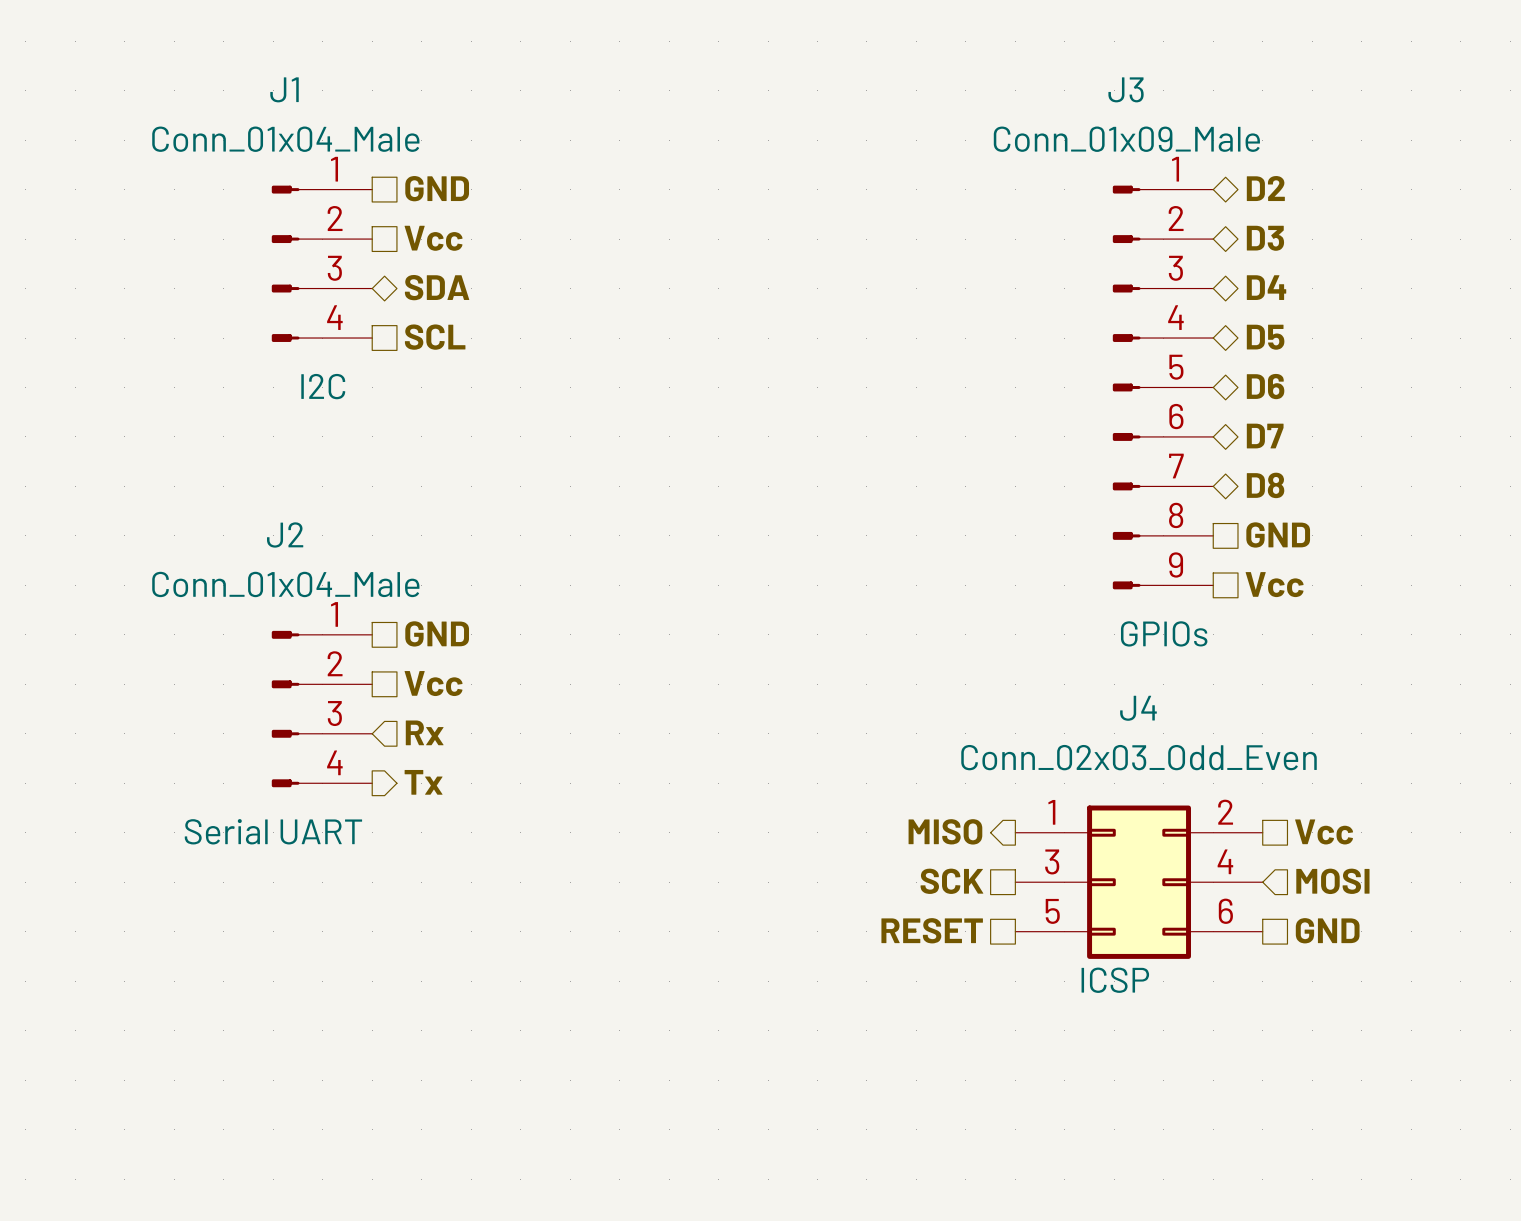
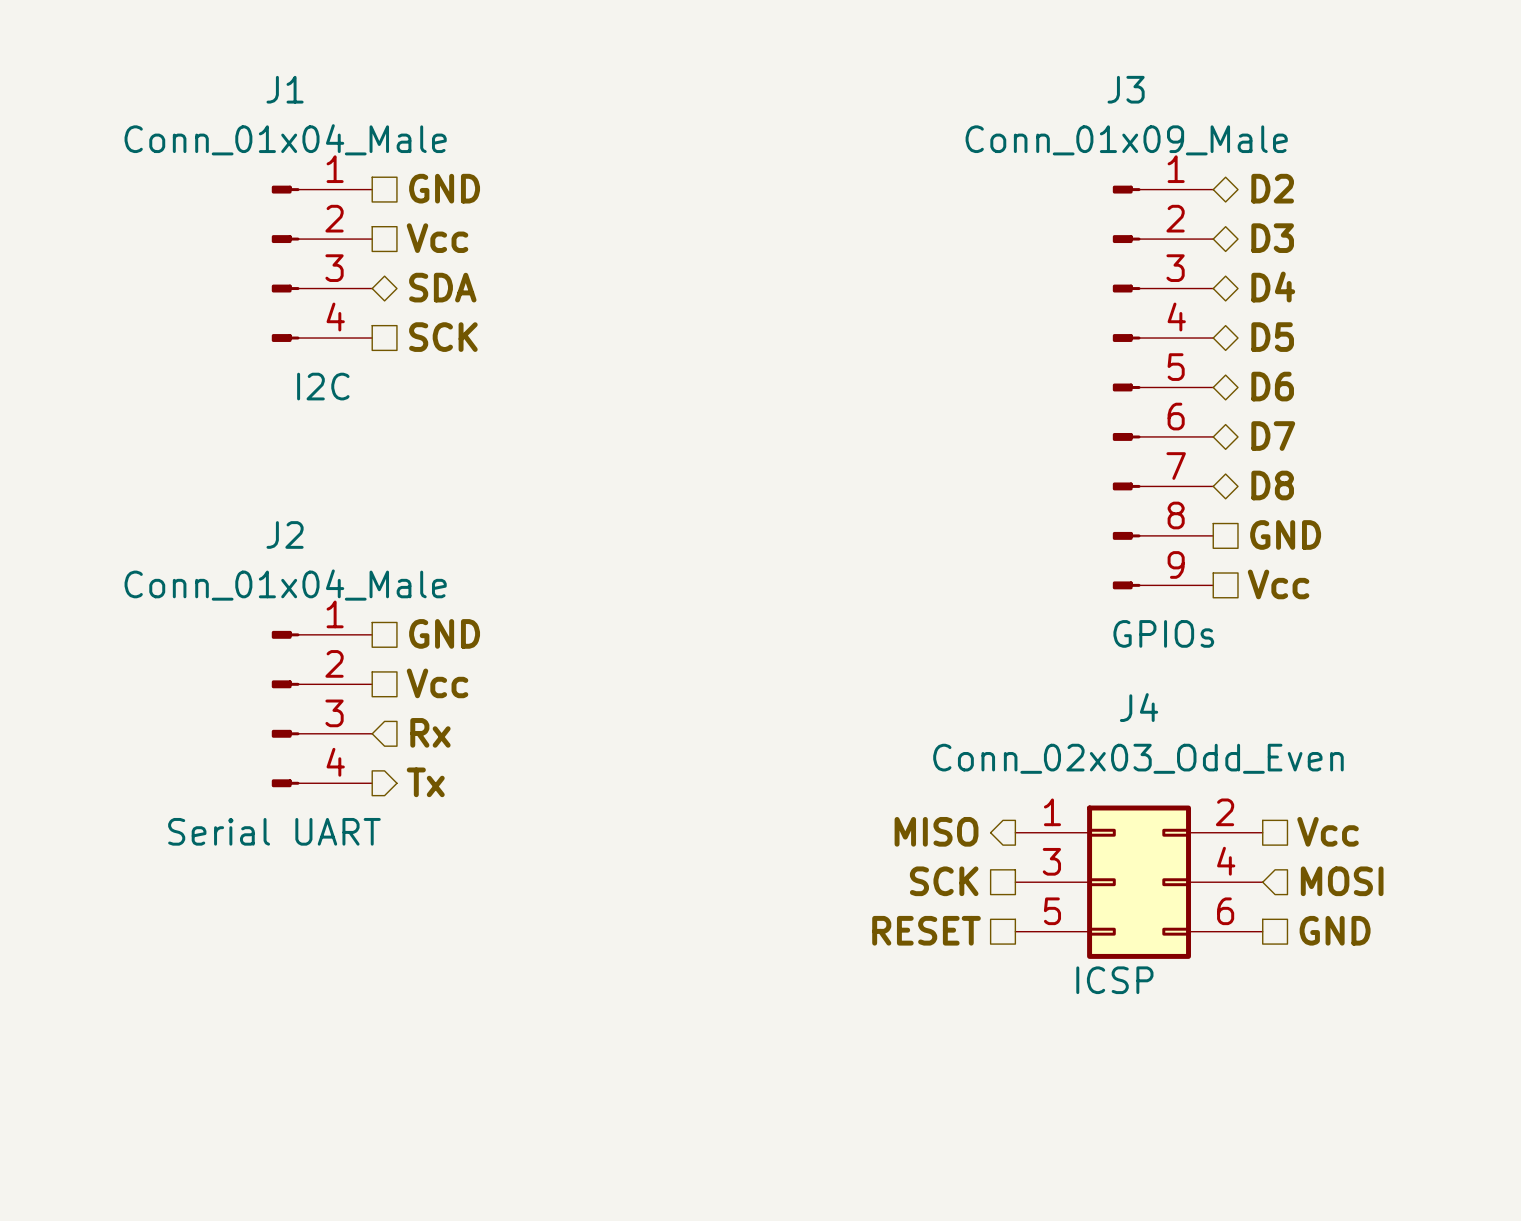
hierarchical label: SCL (435, 337) -> SCK (443, 337)

